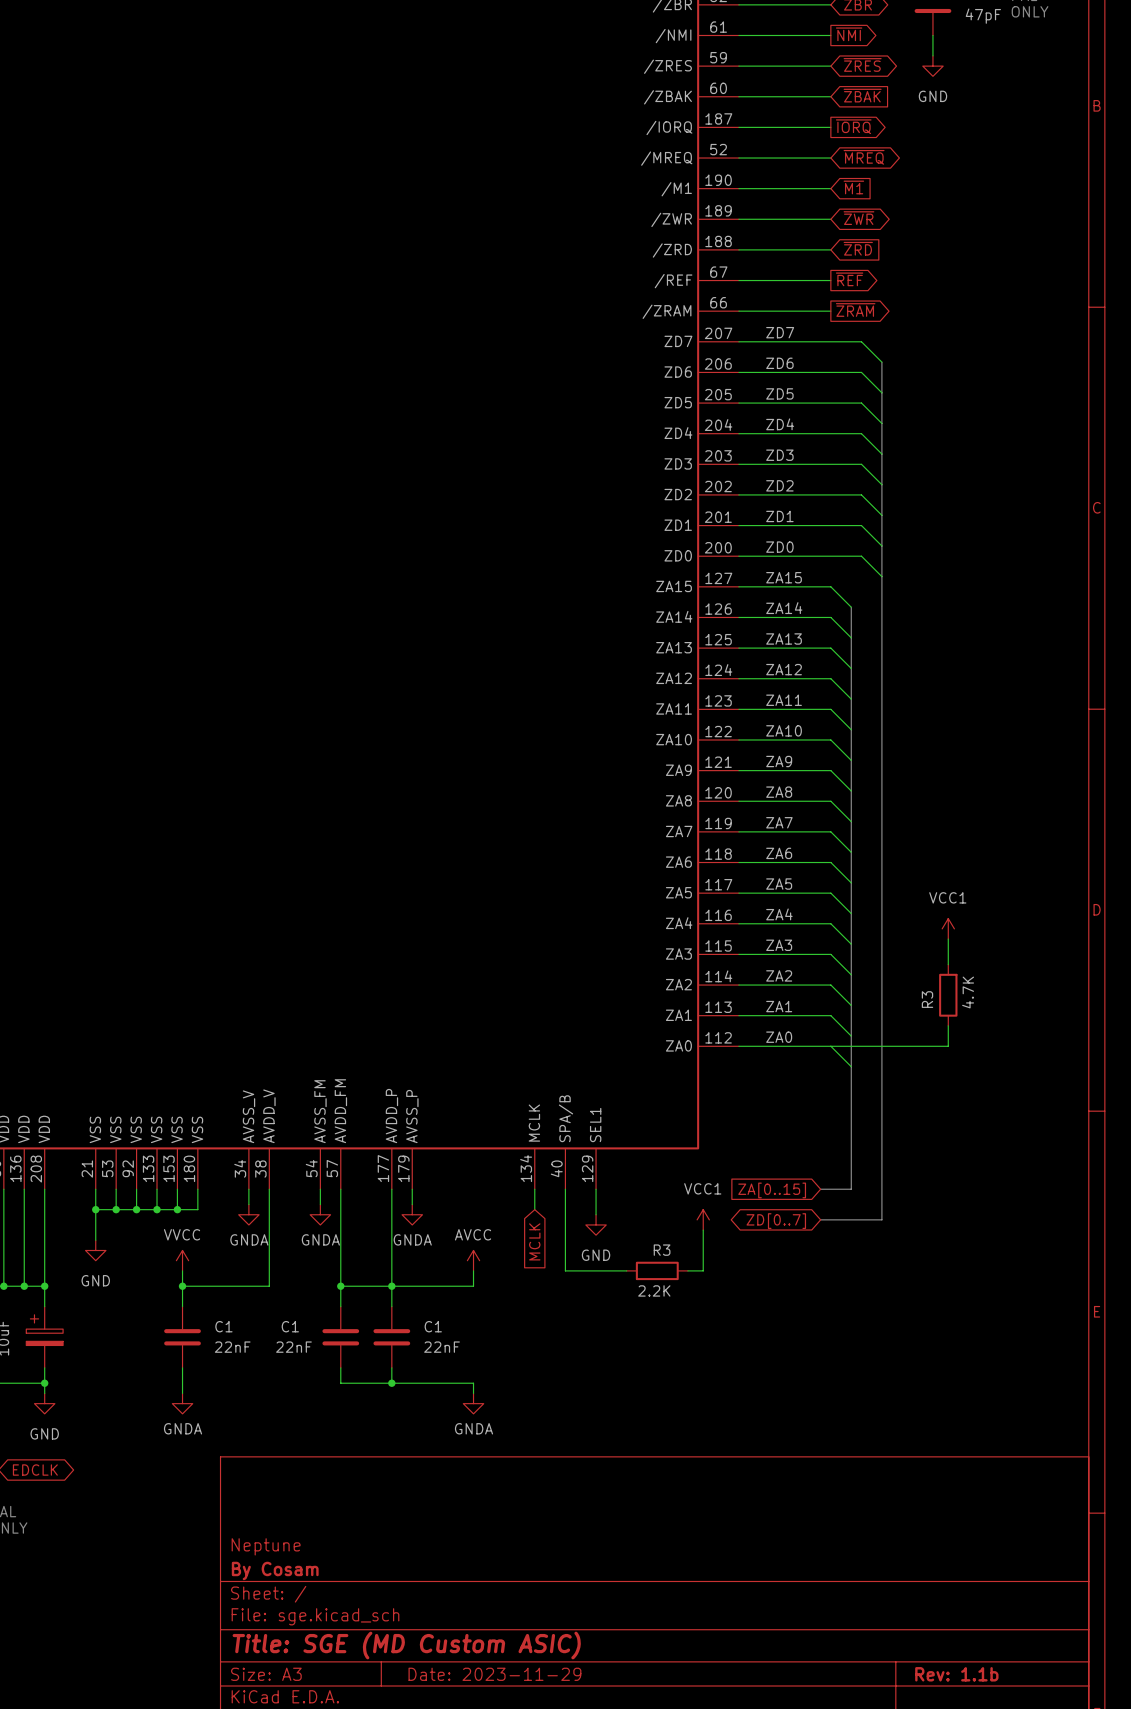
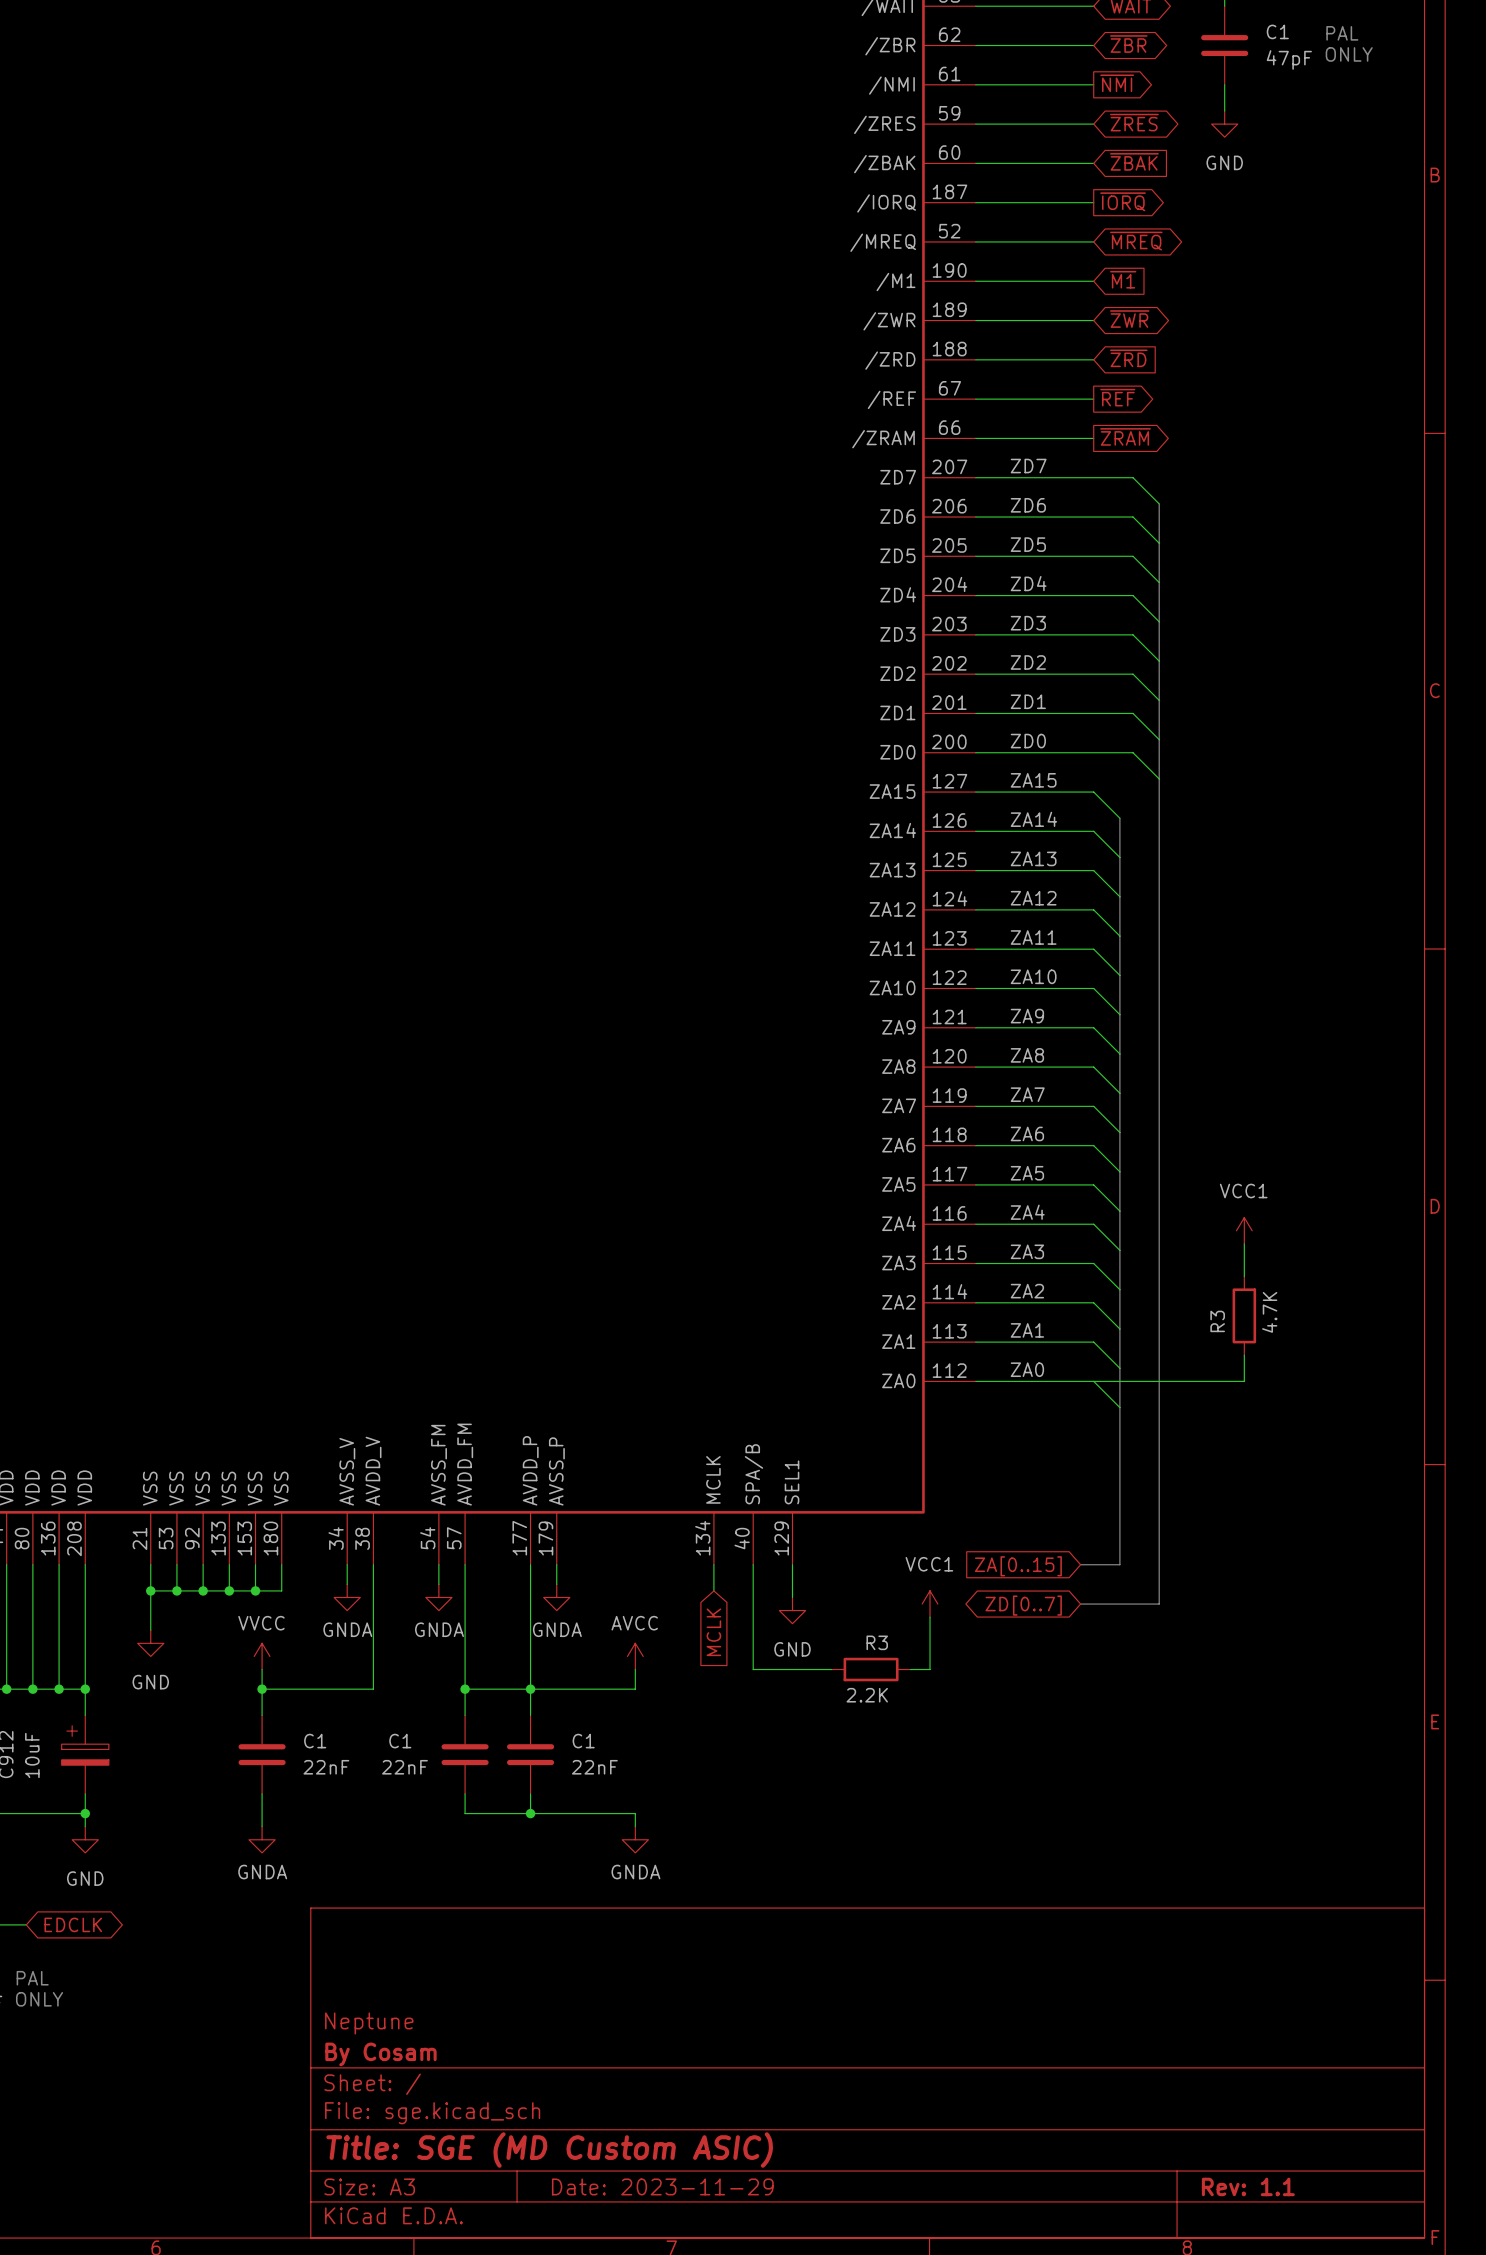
title block: Rev: 1.1b (956, 1674) -> Rev: 1.1 (1248, 2186)

